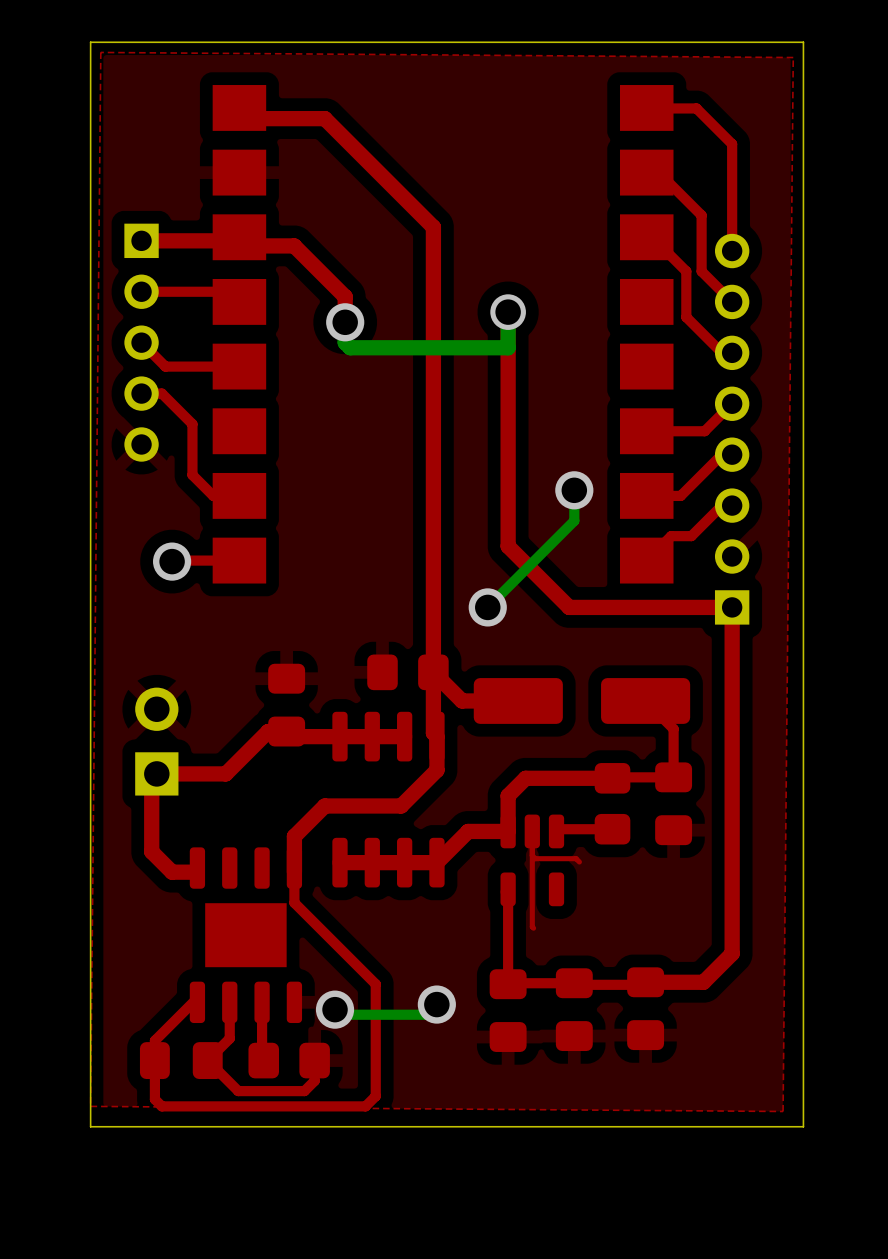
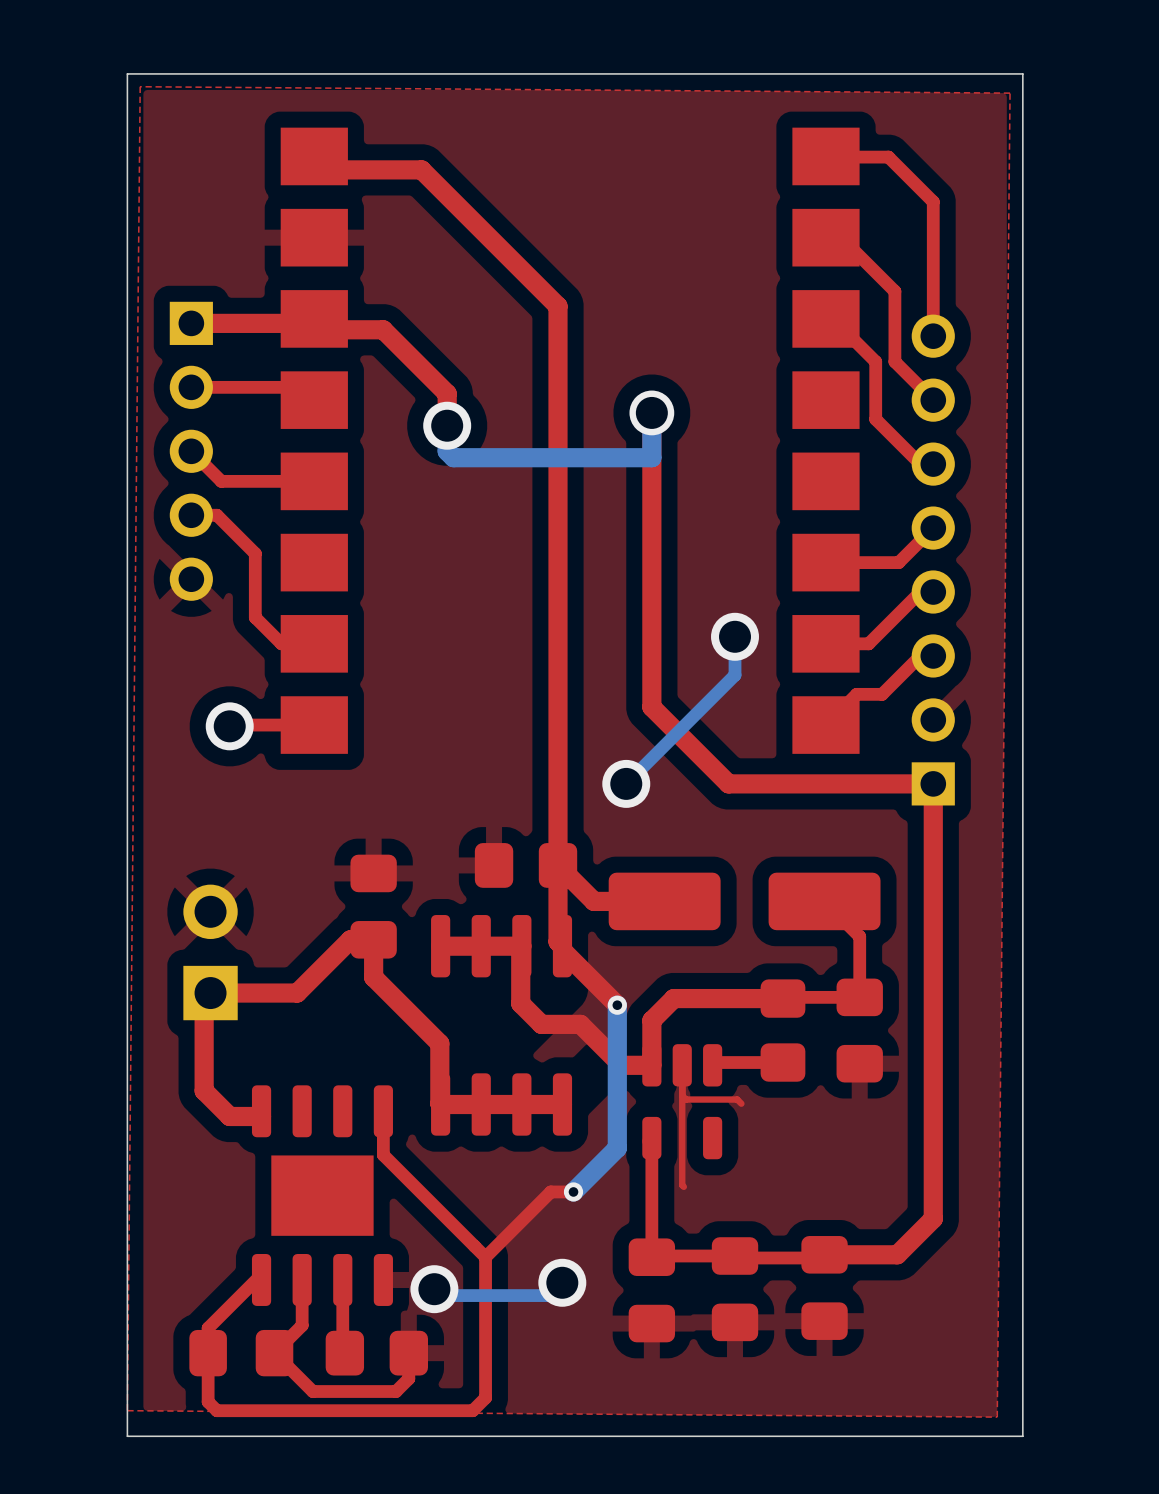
top track: none -> (373, 939) (373, 977) (439, 1043) (440, 1104)
top track: (339, 736) (291, 736) -> none
top track: (436, 739) (436, 770) (401, 805) (324, 805) (294, 836) (294, 872) -> (562, 950) (617, 1005)
bottom track: none -> (617, 1005) (617, 1148) (573, 1191)
via: none -> (617, 1005)
top track: (483, 831) (468, 831) (436, 862) -> (621, 1065) (580, 1024) (541, 1024) (520, 1003) (521, 946)
top track: none -> (573, 1191) (550, 1191) (485, 1257)
via: none -> (573, 1191)

